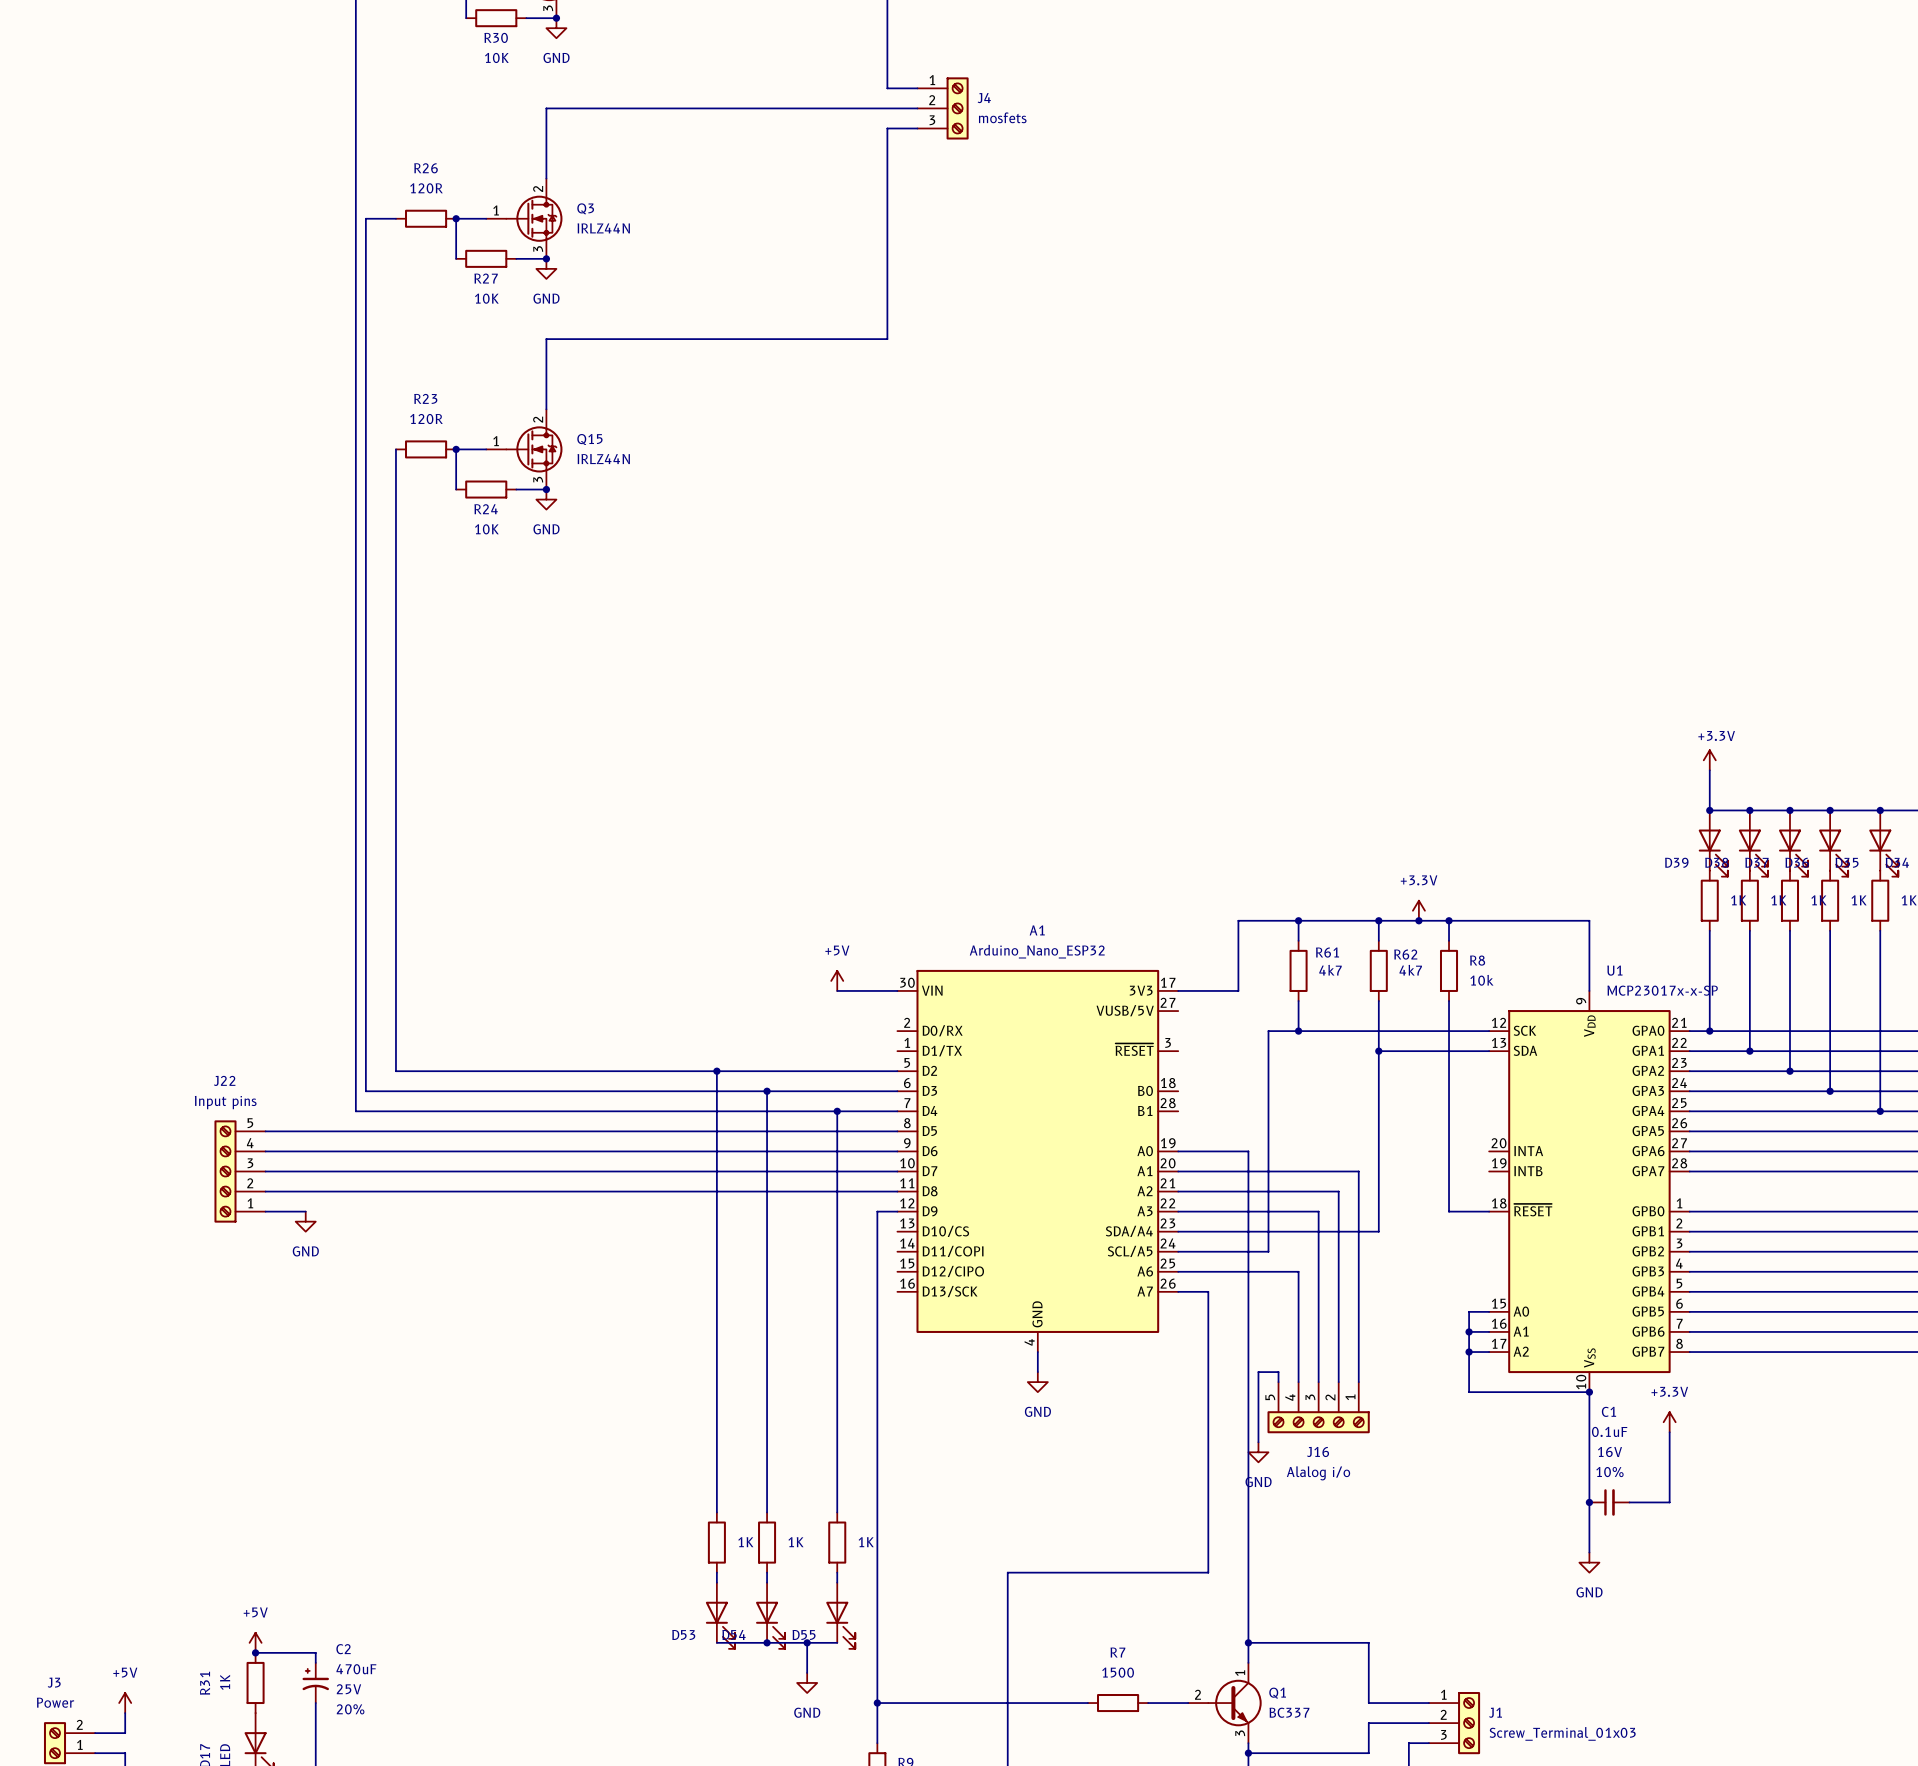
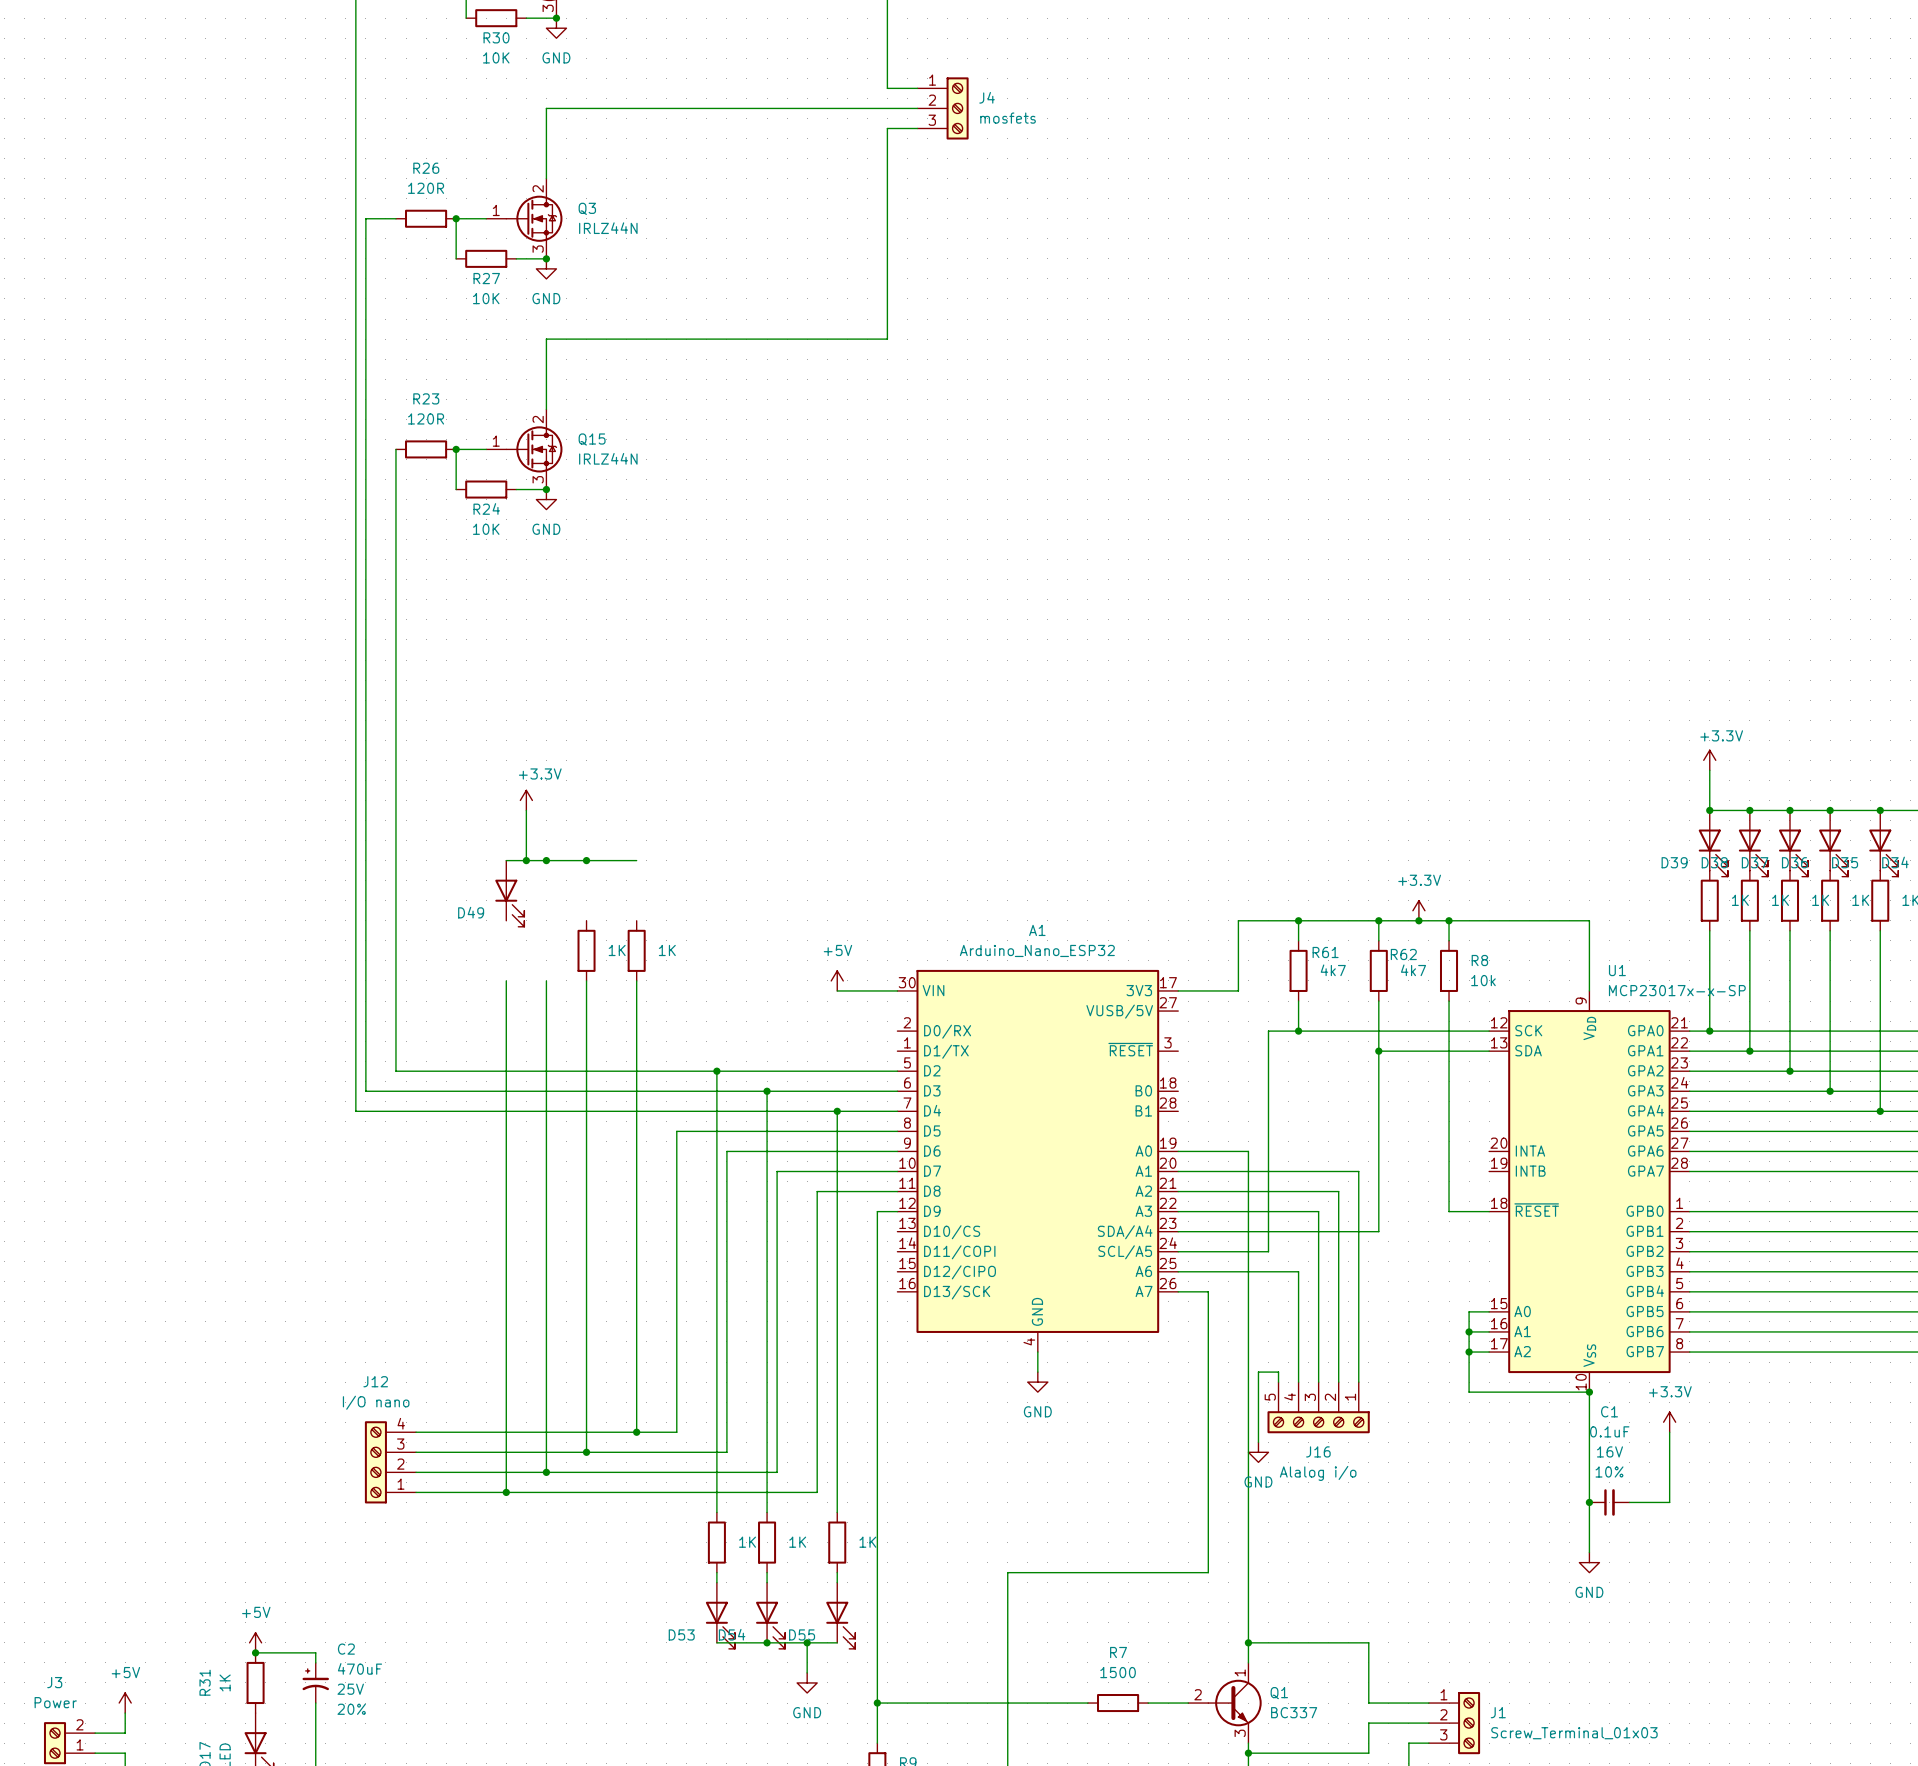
power symbol: none -> +3.3V (526, 800)
wire: none -> (526, 810) (526, 860)
wire: none -> (506, 860) (636, 860)
junction: none -> (526, 860)
junction: none -> (546, 860)
junction: none -> (586, 860)
D49: none -> (509, 893)
part: none -> 1K (586, 950)
part: none -> 1K (636, 950)
wire: none -> (506, 980) (506, 1492)
wire: none -> (546, 980) (546, 1472)
wire: none -> (586, 980) (586, 1452)
wire: none -> (636, 980) (636, 1432)
wire: (265, 1131) (676, 1131) -> (416, 1432) (676, 1432) (676, 1131)
wire: (265, 1151) (726, 1151) -> (416, 1452) (726, 1452) (726, 1151)
J22: Input pins (240, 1171) -> none
wire: (265, 1171) (777, 1171) -> (416, 1472) (777, 1472) (777, 1171)
wire: (265, 1191) (817, 1191) -> (416, 1492) (817, 1492) (817, 1191)
wire: (265, 1211) (305, 1211) -> none
power symbol: GND (305, 1221) -> none
junction: none -> (636, 1432)
junction: none -> (586, 1452)
J12: none -> I/O nano (390, 1462)
junction: none -> (546, 1472)
junction: none -> (506, 1492)

